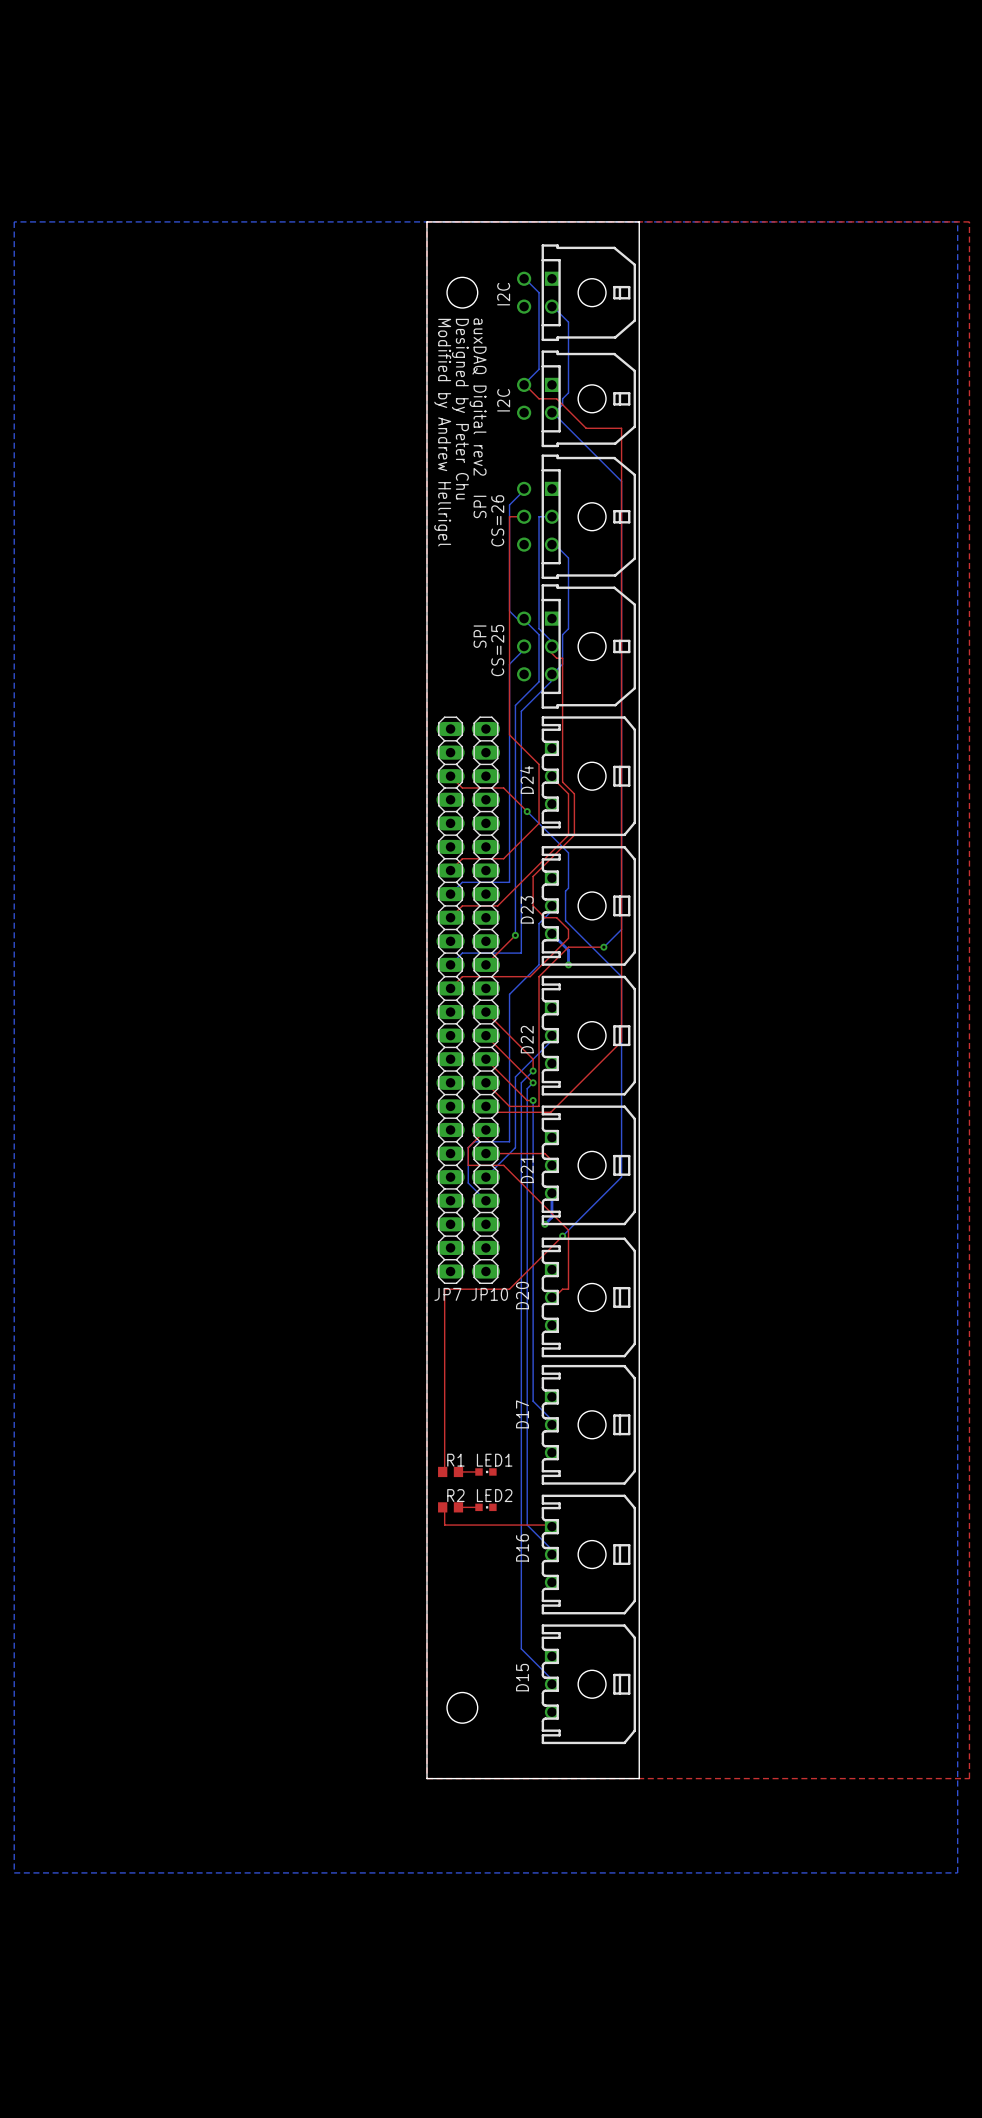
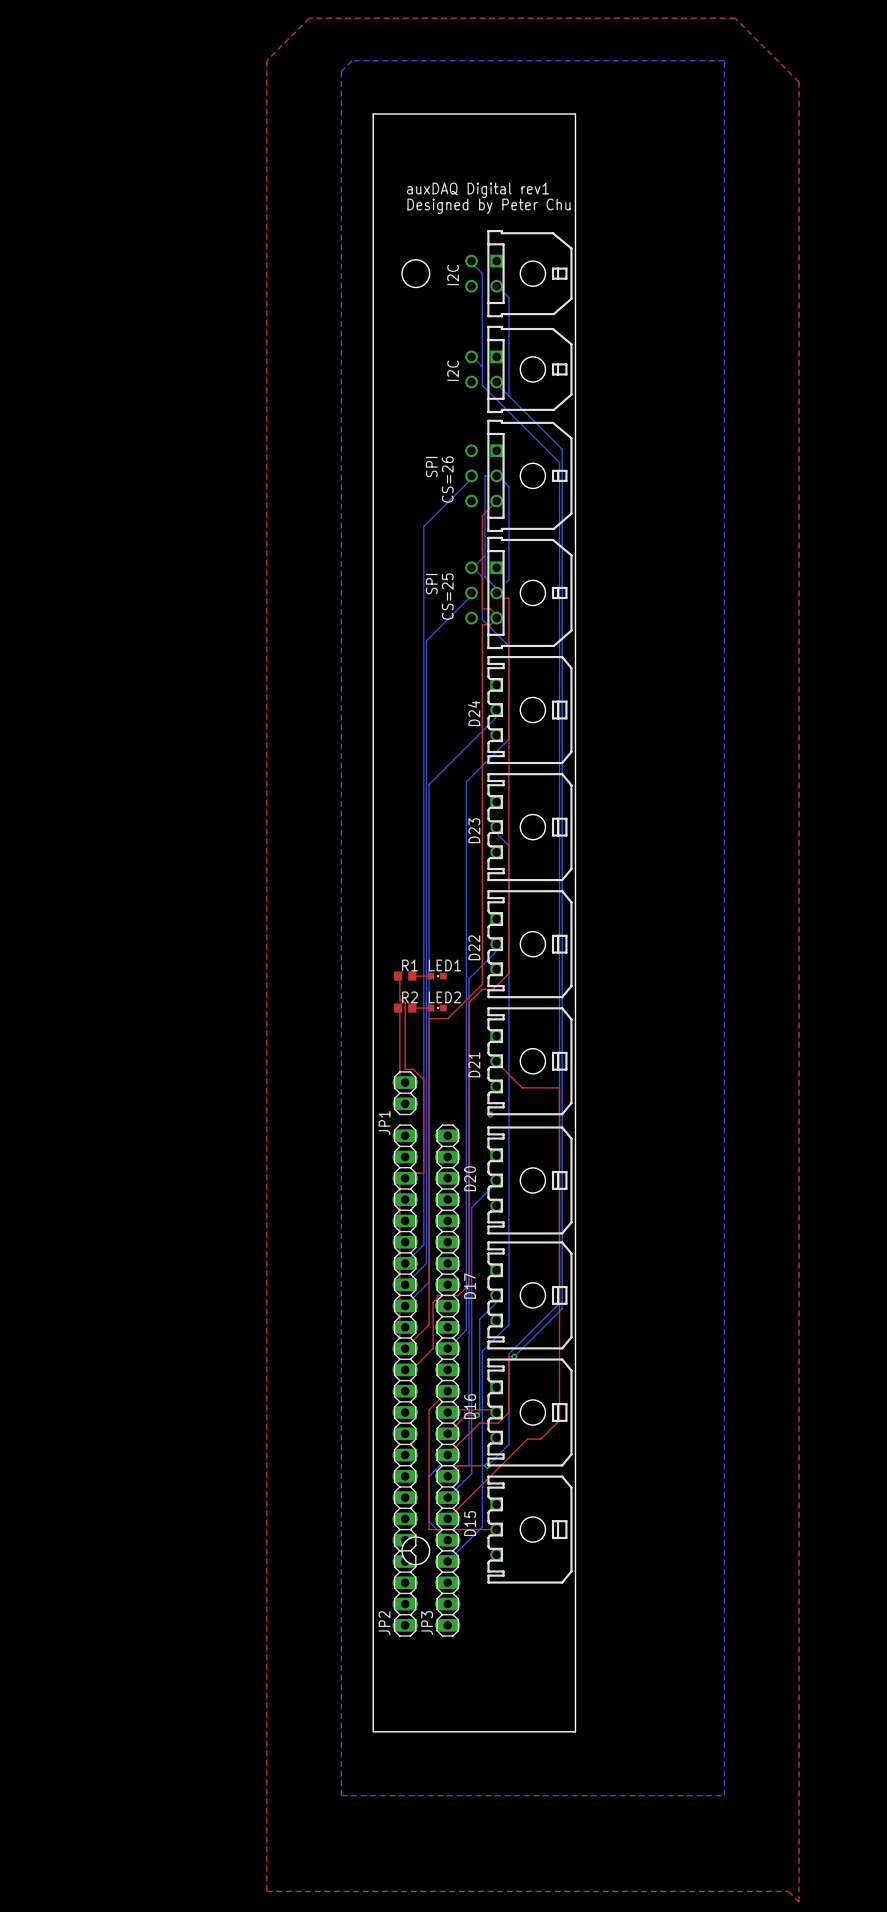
bottom zone outline: none -> (351, 60) (341, 71) (341, 1795) (724, 1795) (724, 60) (351, 60)
text: none -> auxDAQ Digital rev1 (478, 190)
bottom zone outline: (14, 221) (14, 1872) (957, 1872) (957, 221) (14, 221) -> none
top zone outline: (426, 221) (426, 1778) (969, 1778) (969, 221) (426, 221) -> (309, 18) (266, 60) (266, 1891) (788, 1891) (798, 1902) (798, 82) (735, 18) (309, 18)
board edge: (639, 221) (426, 221) (426, 1778) (639, 1778) -> (575, 209) (575, 114) (373, 114) (373, 1731) (575, 1731) (575, 1614)
bottom track: (524, 278) (539, 292) (539, 369) (524, 384) -> (482, 366) (471, 356)
bottom track: (565, 319) (568, 322) (568, 392) (562, 398) (562, 404) (551, 412) (621, 481) (621, 502) -> (471, 261) (482, 273) (482, 385) (559, 462)
bottom track: none -> (508, 297) (508, 396)
top track: (524, 384) (539, 398) (556, 398) (586, 428) (621, 428) (621, 1041) (550, 1112) (491, 1112) (485, 1106) -> none
text: auxDAQ Digital rev2 (478, 397) -> none
text rotation: 0° (460, 409) -> 90° counterclockwise (488, 206)
text position: Designed by Peter Chu (460, 409) -> Designed by Peter Chu (488, 206)
bottom track: none -> (496, 382) (562, 449) (562, 1308) (514, 1356)
text: Modified by Andrew Hellrigel (442, 432) -> none
bottom track: (524, 488) (509, 504) (509, 611) (521, 622) (524, 618) (539, 634) (539, 681) (515, 705) (515, 935) -> none
top track: (524, 516) (509, 516) (509, 734) (539, 764) (539, 823) (503, 858) (462, 858) (450, 870) -> none
bottom track: none -> (471, 475) (469, 475) (469, 481) (423, 526) (423, 1244) (405, 1263)
top track: none -> (496, 501) (482, 515) (482, 608) (490, 608) (498, 616) (490, 624) (482, 624) (482, 984) (447, 1018) (429, 1018) (429, 1324) (405, 1348)
bottom track: (551, 544) (556, 546) (568, 558) (568, 628) (565, 631) -> (496, 475) (508, 486) (508, 579)
bottom track: none -> (485, 555) (474, 566) (474, 569) (471, 567) (482, 576) (482, 619) (508, 646) (508, 739) (466, 781) (466, 1330) (447, 1348)
bottom track: (562, 634) (562, 664) (550, 675) (550, 681) (521, 711) (521, 953) (462, 953) (450, 964) -> none
top track: (551, 646) (550, 652) (556, 658) (562, 658) (562, 782) (574, 793) (574, 835) (533, 876) (533, 905) (544, 917) (556, 917) (568, 929) (568, 938) (530, 976) (462, 976) (450, 988) -> (496, 592) (503, 598) (508, 598) (508, 973) (492, 989) (482, 989) (469, 1002) (469, 1284) (458, 1295) (437, 1295) (437, 1298) (433, 1302) (433, 1348) (411, 1369) (405, 1369)
bottom track: (509, 664) (509, 882) (462, 882) (450, 894) -> (458, 608) (426, 640) (426, 1263) (405, 1284)
top track: (450, 776) (462, 787) (503, 787) (527, 811) -> none
top track: (551, 776) (568, 793) (568, 835) (497, 905) (462, 905) (450, 917) -> none
bottom track: none -> (496, 710) (495, 718) (429, 784) (429, 1282) (405, 1306)
bottom track: (527, 811) (568, 852) (568, 888) (565, 891) (565, 920) (621, 976) -> none
via: (527, 811) -> none
bottom track: (551, 905) (550, 911) (539, 923) (539, 964) (509, 994) (509, 1141) (474, 1141) (468, 1147) (468, 1183) (485, 1200) -> (496, 827) (498, 827) (498, 835) (508, 845) (508, 1324) (482, 1351) (482, 1526) (447, 1561)
bottom track: (621, 929) (603, 947) -> (559, 848) (559, 890)
bottom track: (551, 933) (568, 950) (568, 964) -> none
top track: (515, 935) (485, 964) -> none
via: (515, 935) -> none
top track: (603, 947) (568, 947) (539, 976) (539, 1106) (509, 1106) (485, 1082) -> none
via: (603, 947) -> none
via: (568, 964) -> none
JP7: (450, 1000) -> none
JP10: (485, 1000) -> none
top track: (485, 1012) (533, 1059) (533, 1071) -> none
top track: (485, 1035) (533, 1082) -> none
bottom track: (550, 1041) (515, 1076) (515, 1147) (485, 1177) -> none
top track: (485, 1059) (527, 1100) (533, 1100) -> none
top track: none -> (412, 976) (430, 976)
bottom track: (533, 1071) (521, 1082) -> (495, 949) (495, 952) (469, 978) (469, 986)
via: (533, 1071) -> none
bottom track: (533, 1082) (527, 1088) (527, 1525) (550, 1548) (551, 1554) -> none
via: (533, 1082) -> none
bottom track: (533, 1100) (533, 1401) (550, 1418) (550, 1424) -> (477, 1415) (479, 1412) (479, 1319) (495, 1303) (495, 1295)
via: (533, 1100) -> none
top track: none -> (398, 1008) (399, 1008) (399, 1082) (405, 1082)
top track: none -> (412, 1008) (430, 1008)
top track: (485, 1129) (468, 1147) (468, 1165) (503, 1165) (568, 1230) (568, 1289) (562, 1289) (551, 1297) -> none
top track: (485, 1153) (544, 1153) (556, 1165) (551, 1165) -> (447, 1518) (527, 1439) (540, 1439) (559, 1420) (559, 1087) (522, 1087) (496, 1061)
bottom track: (621, 1177) (562, 1236) -> (559, 1071) (559, 1303) (508, 1353) (508, 1444) (487, 1465)
bottom track: (551, 1193) (551, 1217) (544, 1224) -> none
JP1: none -> (405, 1093)
top track: (562, 1236) (509, 1289) (471, 1289) -> (398, 976) (399, 976) (399, 1000) (405, 1002) (405, 1069) (413, 1069) (423, 1079) (423, 1173)
via: (562, 1236) -> none
bottom track: none -> (496, 1180) (471, 1207) (471, 1473) (447, 1497)
R1 position: (450, 1471) -> (405, 976)
top track: (458, 1471) (478, 1471) -> none
LED1 position: (485, 1471) -> (437, 976)
top track: none -> (514, 1356) (508, 1356) (508, 1412) (498, 1423) (479, 1423) (447, 1455)
via: none -> (514, 1356)
top track: (442, 1507) (444, 1507) (444, 1525) (550, 1525) (551, 1526) -> none
R2 position: (450, 1507) -> (405, 1008)
top track: (458, 1507) (478, 1507) -> none
LED2 position: (485, 1507) -> (437, 1008)
JP2: none -> (405, 1380)
JP3: none -> (447, 1380)
top track: none -> (447, 1391) (429, 1409) (429, 1529) (496, 1529)
top track: none -> (447, 1412) (450, 1409) (492, 1409) (496, 1412)
top track: none -> (477, 1415) (466, 1415) (447, 1433)
via: none -> (477, 1415)
bottom track: (521, 1613) (521, 1648) (550, 1678) (551, 1684) -> (469, 1465) (439, 1465) (429, 1476) (429, 1521) (447, 1540)
top track: none -> (487, 1465) (458, 1465) (447, 1476)
via: none -> (487, 1465)

